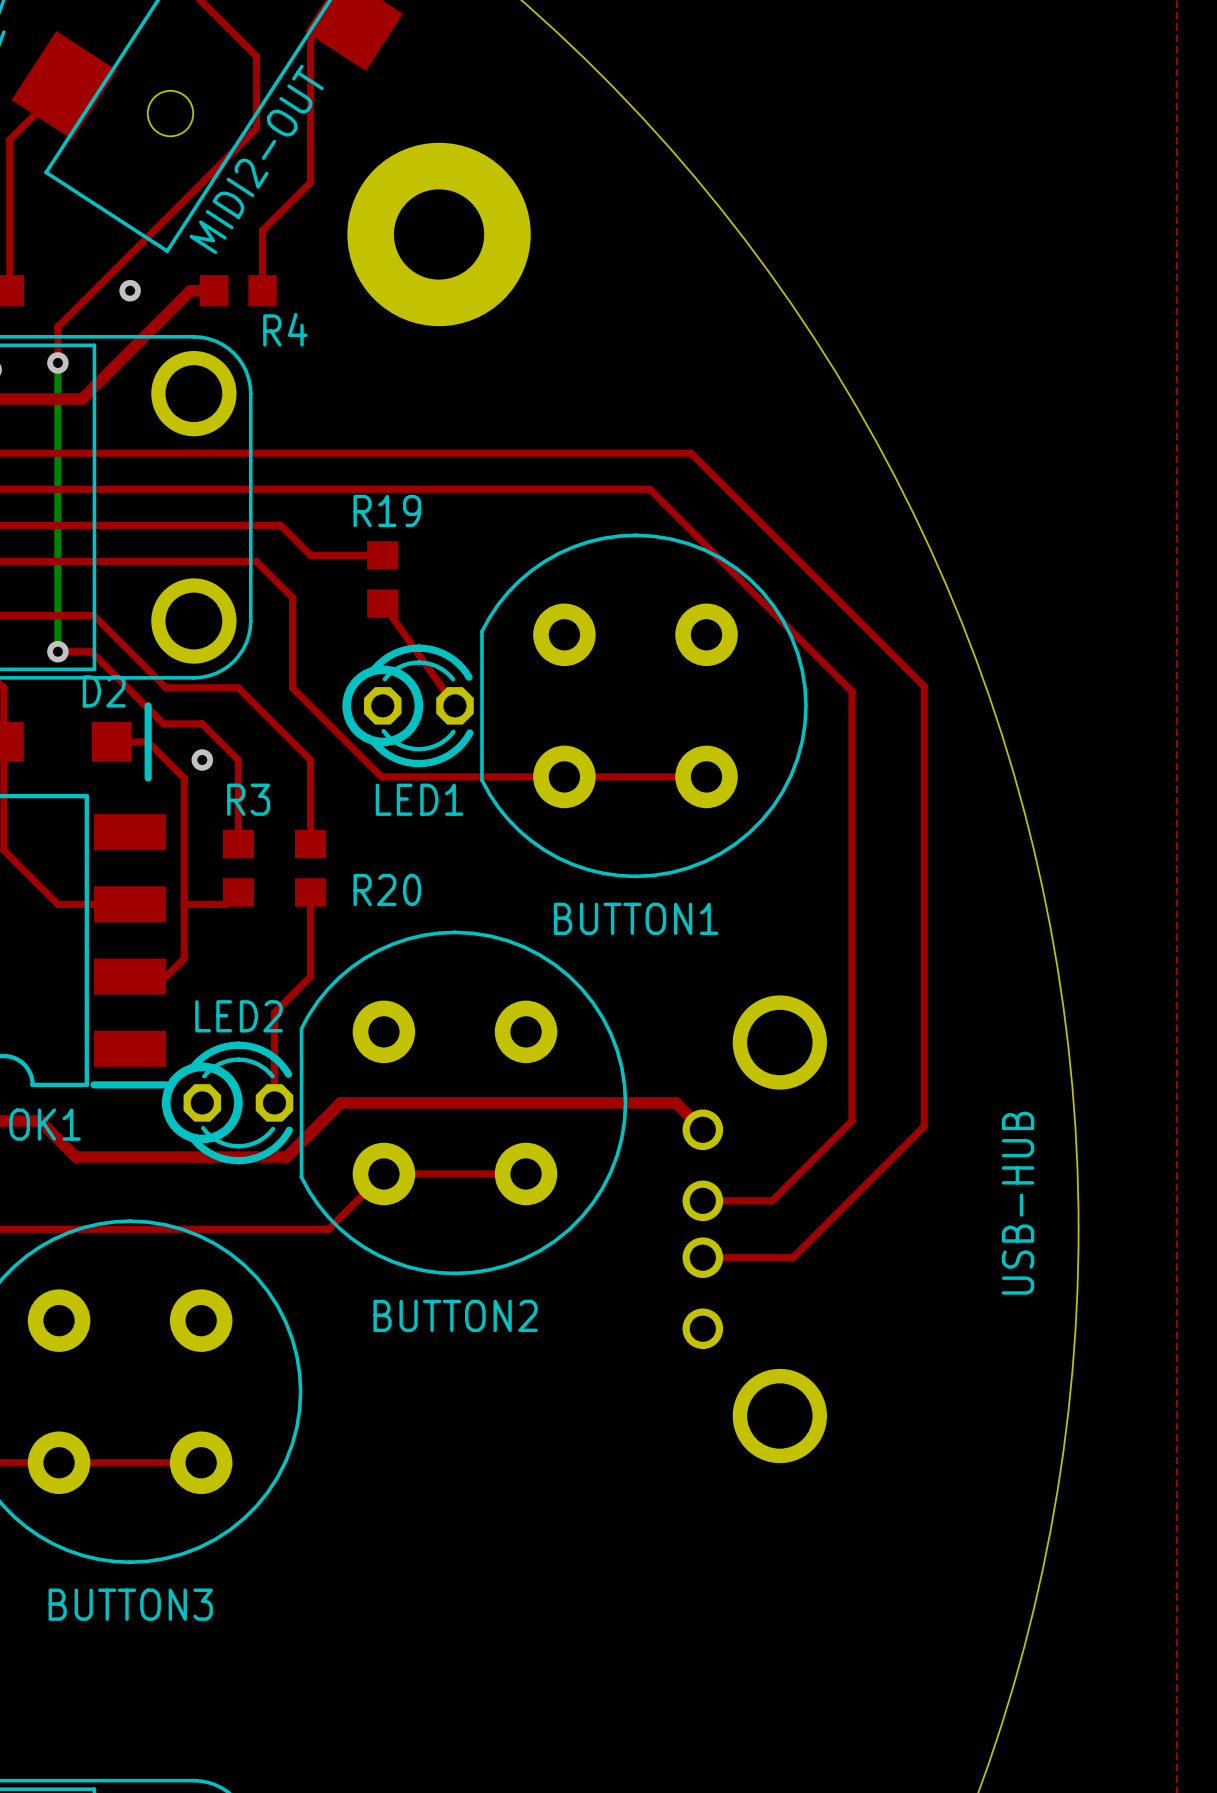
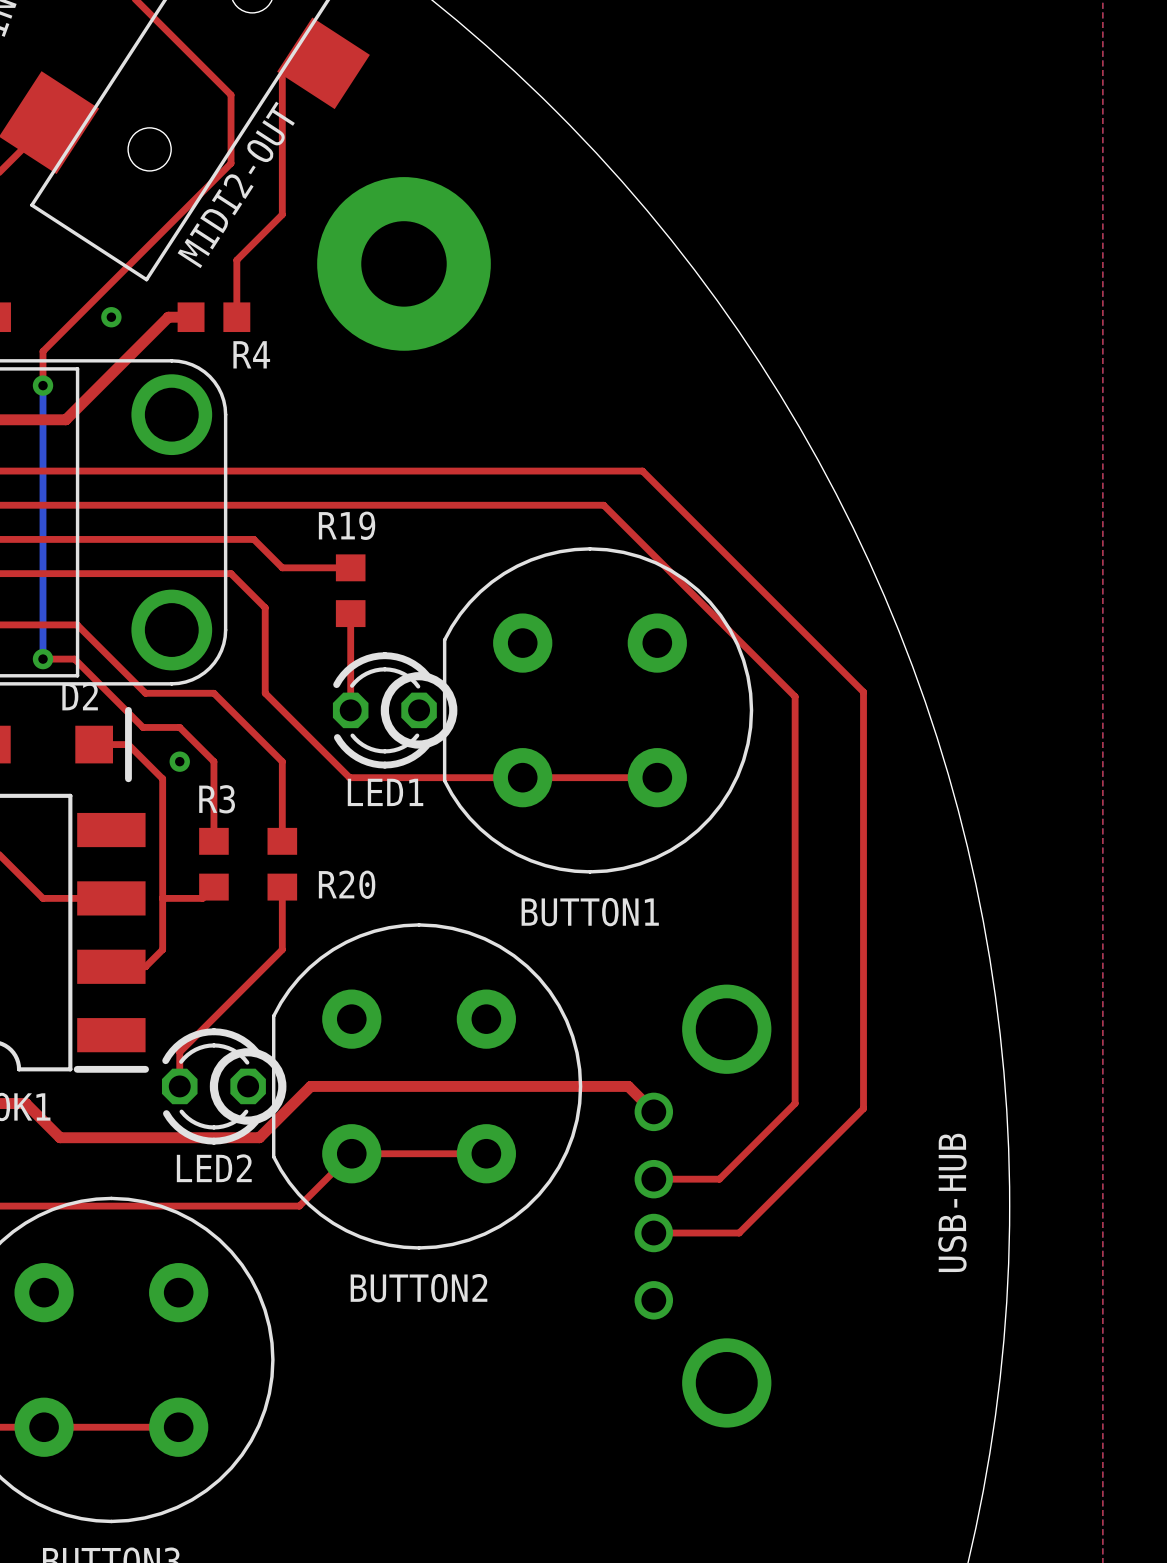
top track: (382, 603) (454, 705) -> (350, 613) (350, 710)
drawing position: (382, 705) -> (419, 710)
LED1 rotation: 0° (418, 705) -> 180° (384, 710)
top track: (310, 958) (310, 976) (274, 1012) (274, 1102) -> (282, 949) (179, 1052) (179, 1086)
drawing position: (202, 1102) -> (248, 1086)
LED2 rotation: 0° (238, 1102) -> 180° (213, 1086)

